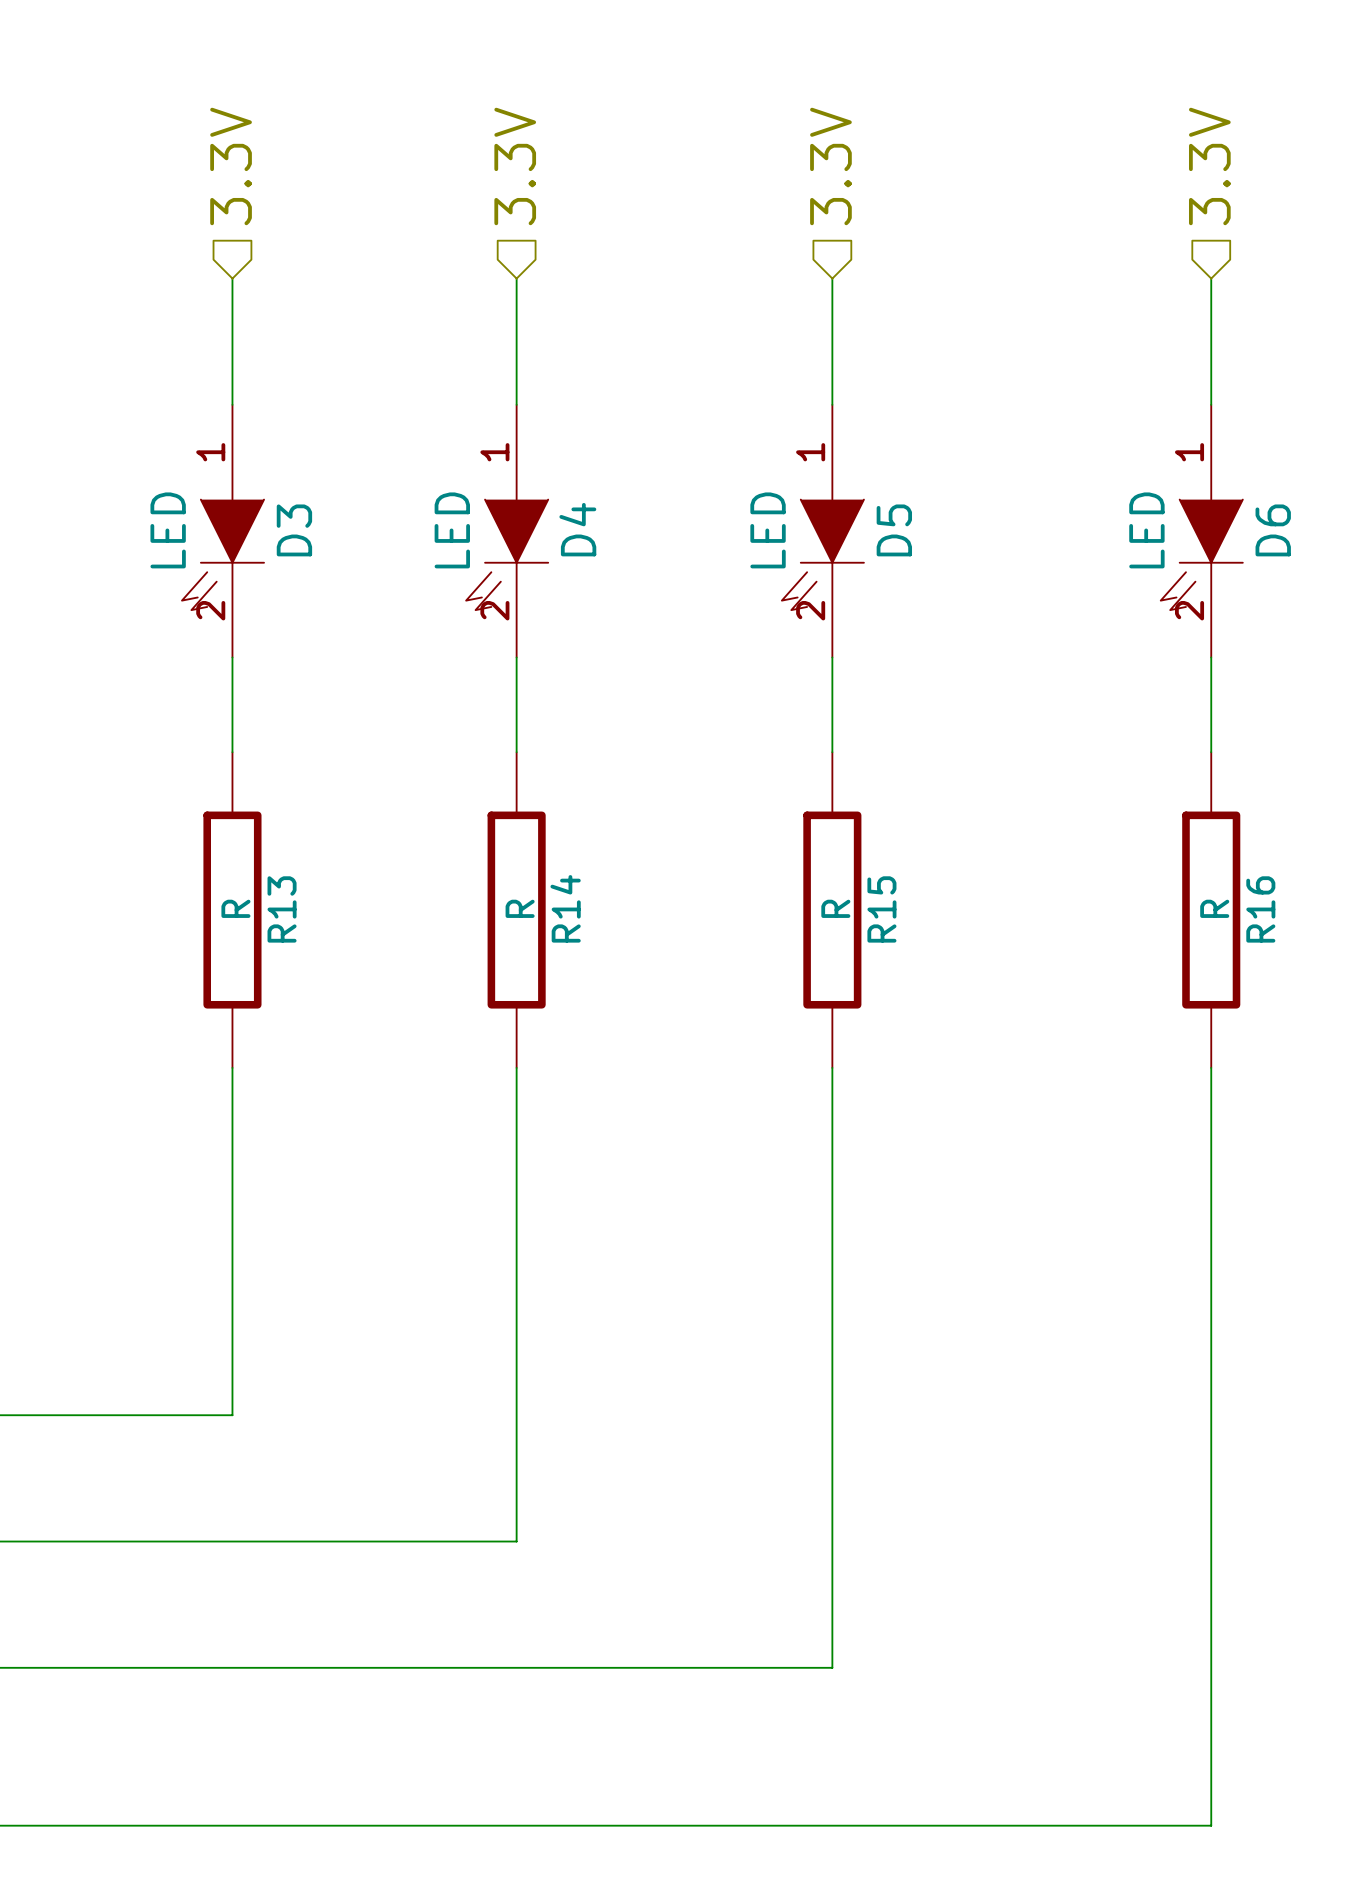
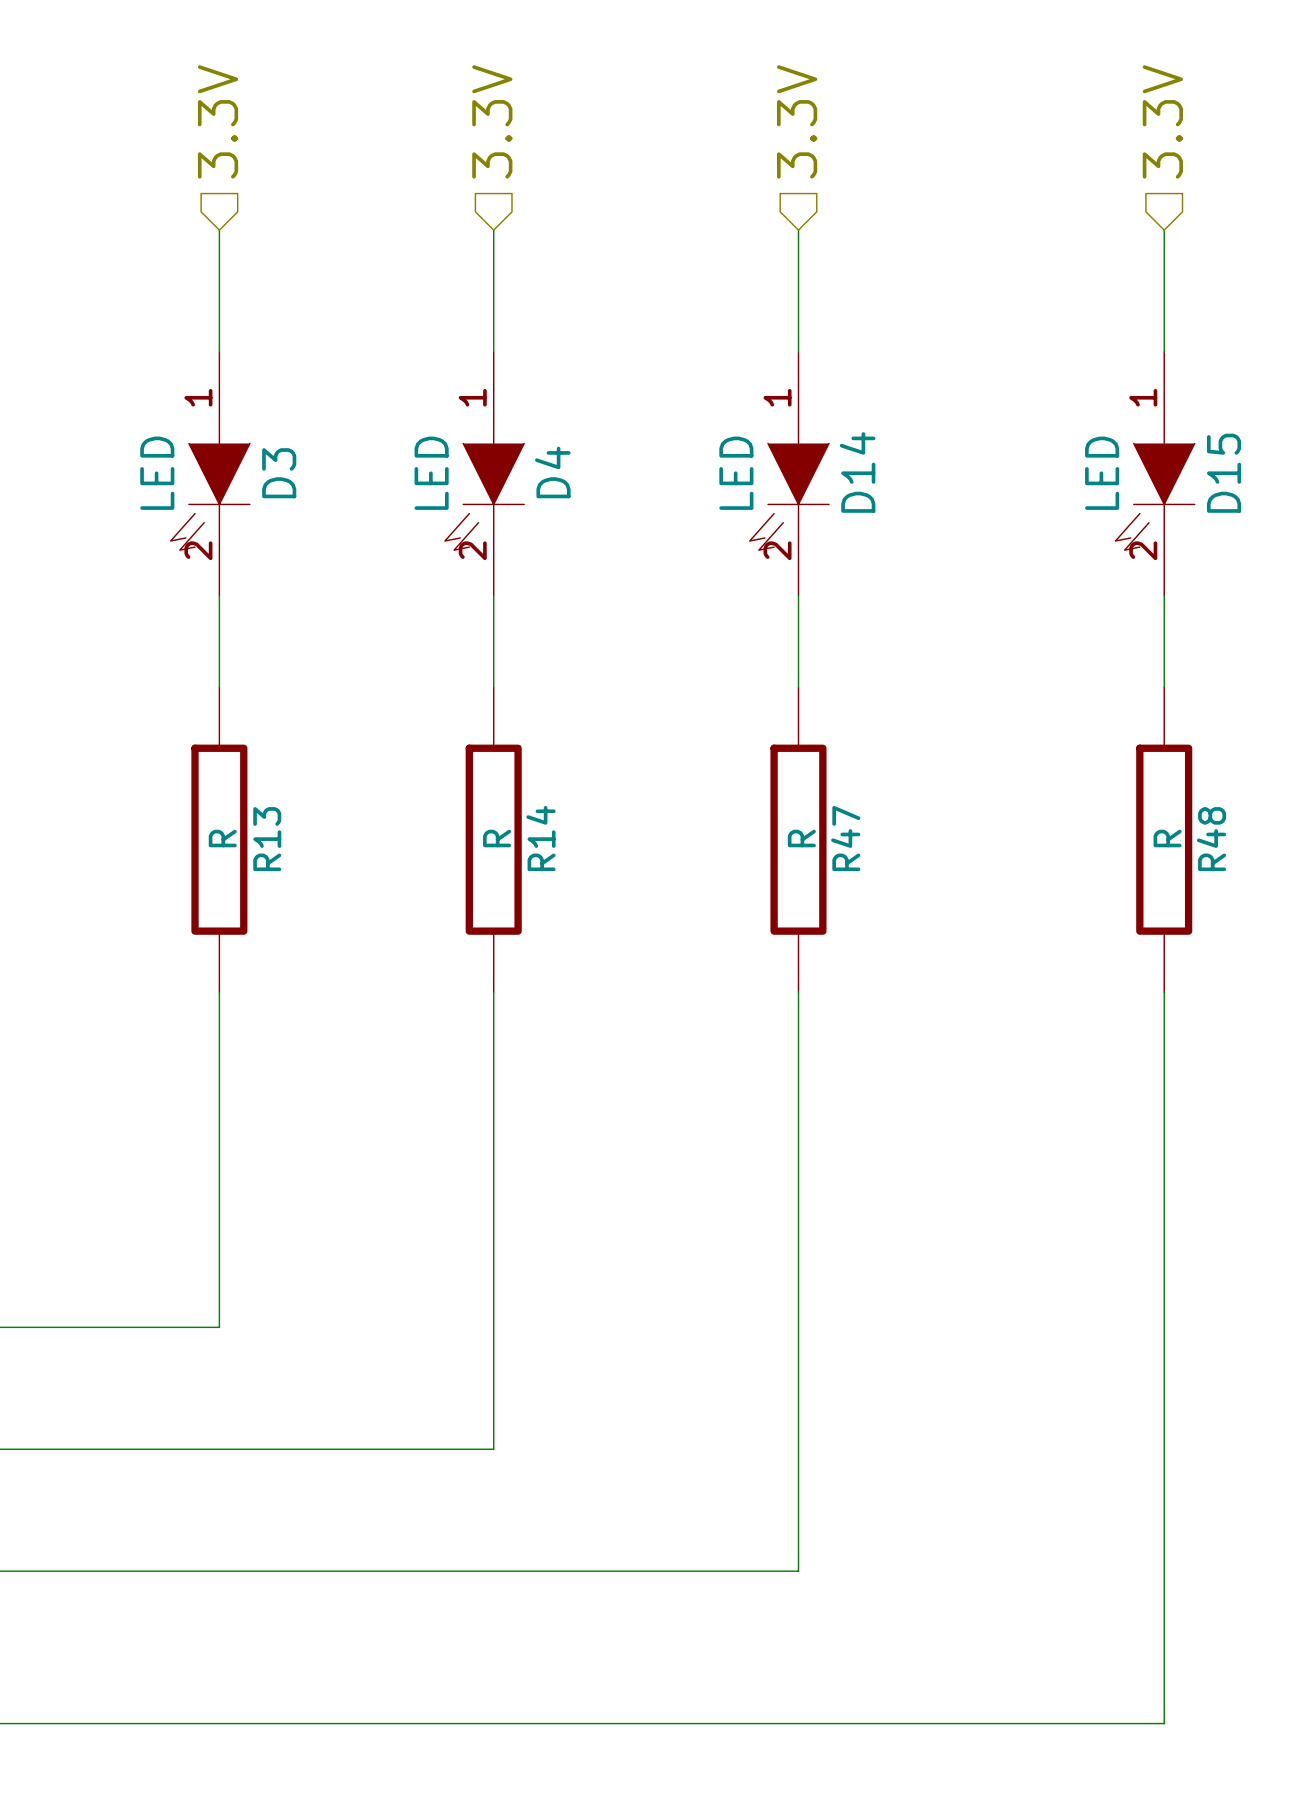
D5 name: D5 (894, 530) -> D14 (857, 472)
D6 name: D6 (1273, 530) -> D15 (1224, 473)
R15 name: R15 (881, 909) -> R47 (845, 838)
R16 name: R16 (1260, 909) -> R48 (1211, 839)

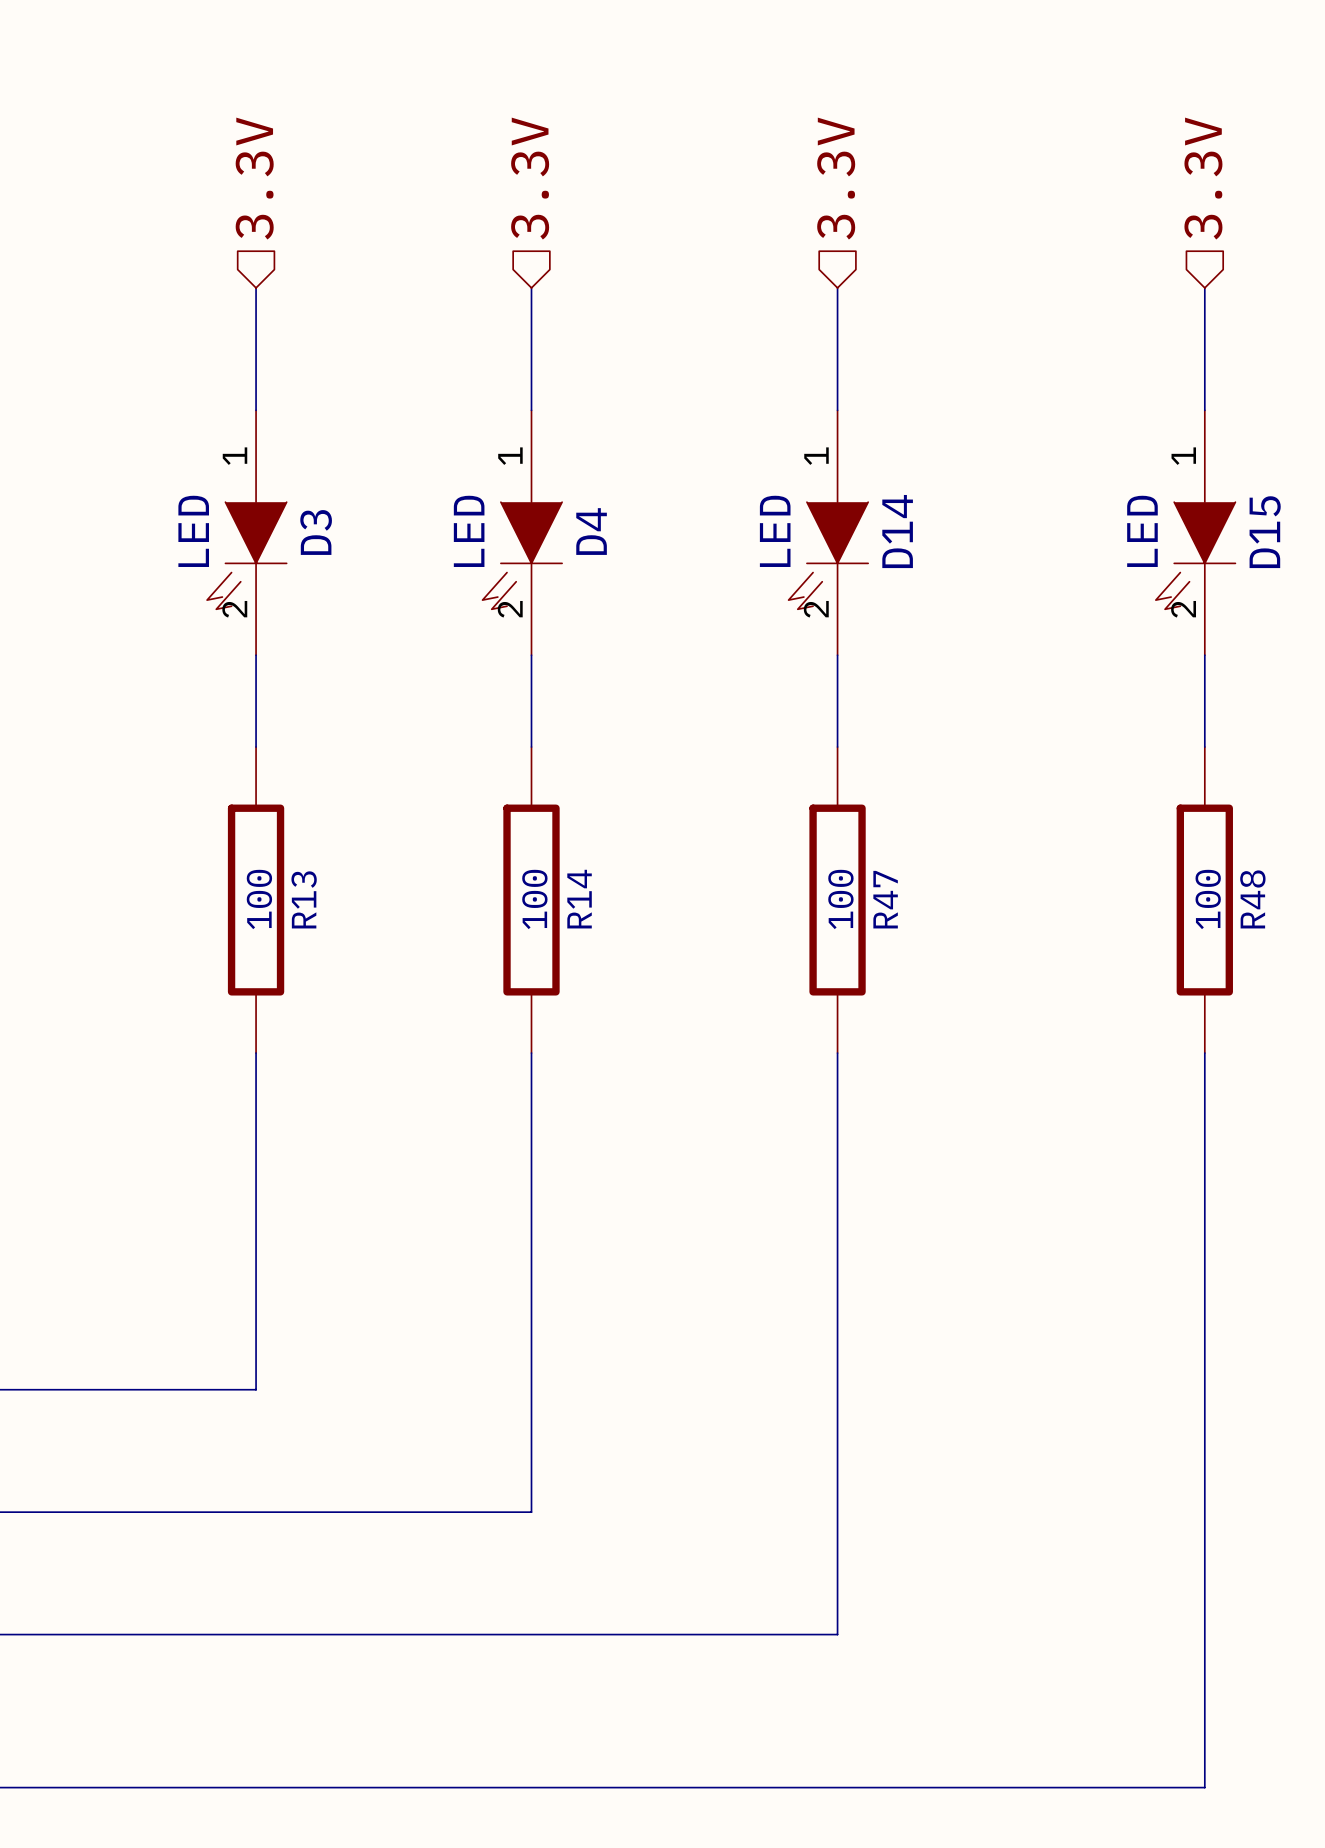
R13 value: R (222, 838) -> 100 (259, 899)
R14 value: R (497, 838) -> 100 (534, 899)
R47 value: R (801, 838) -> 100 (840, 899)
R48 value: R (1167, 838) -> 100 (1208, 899)

